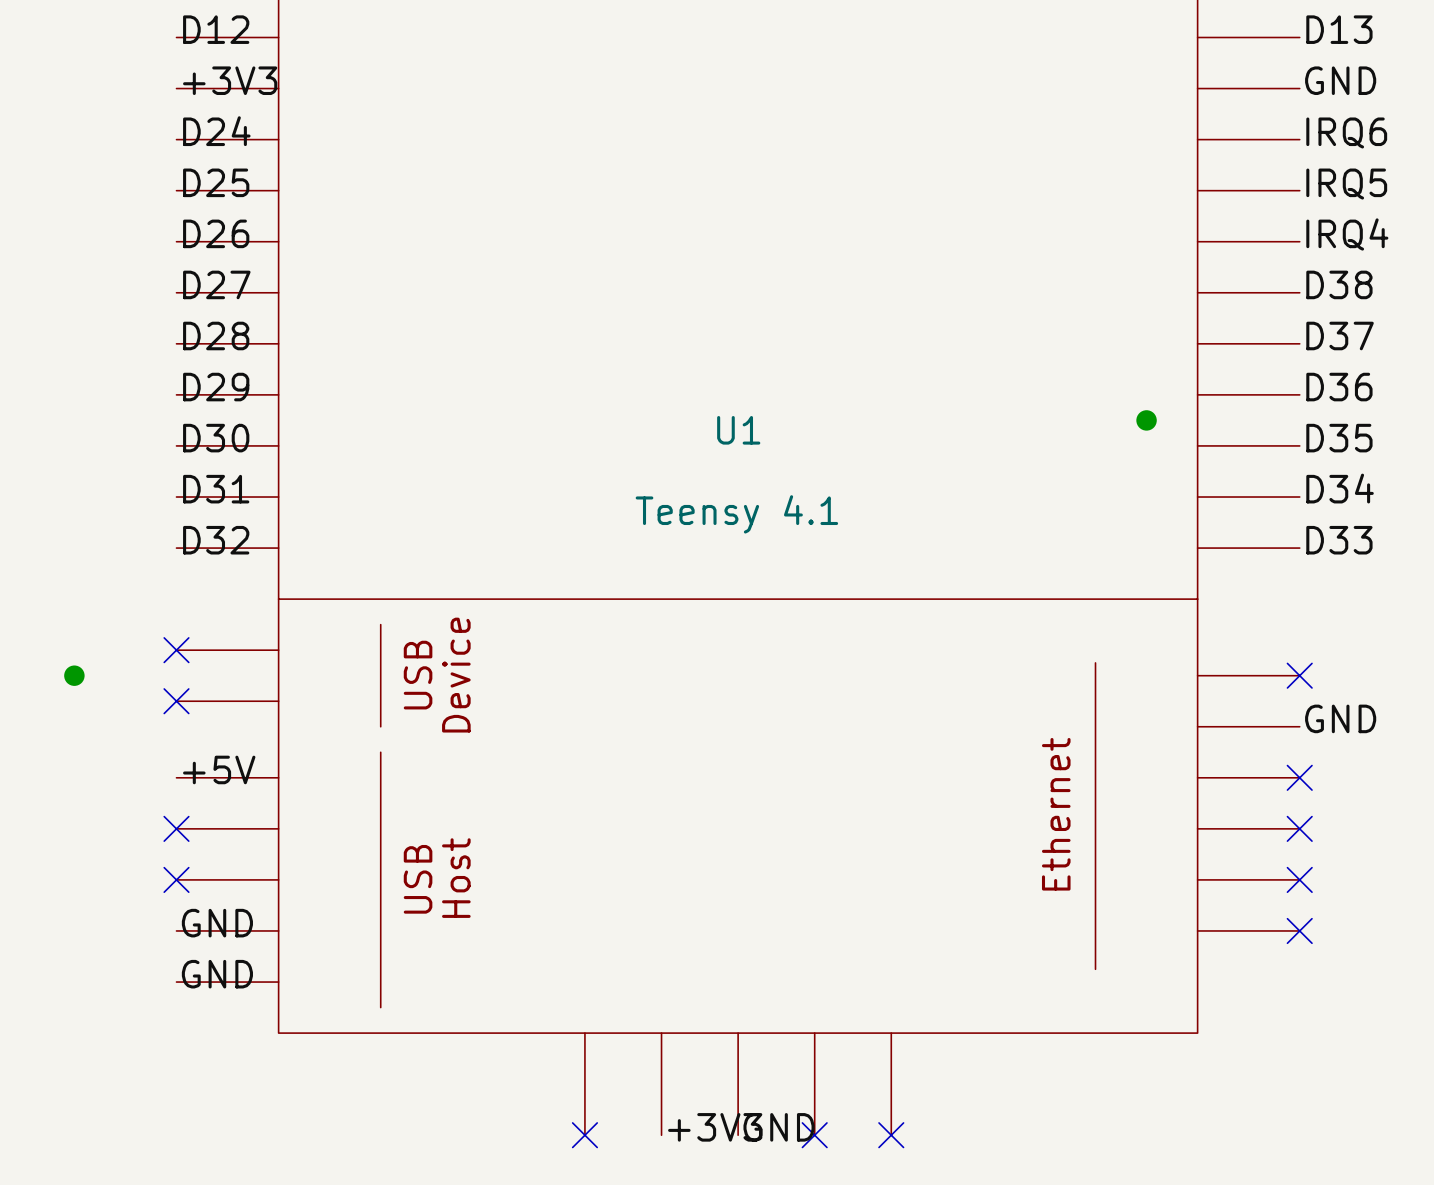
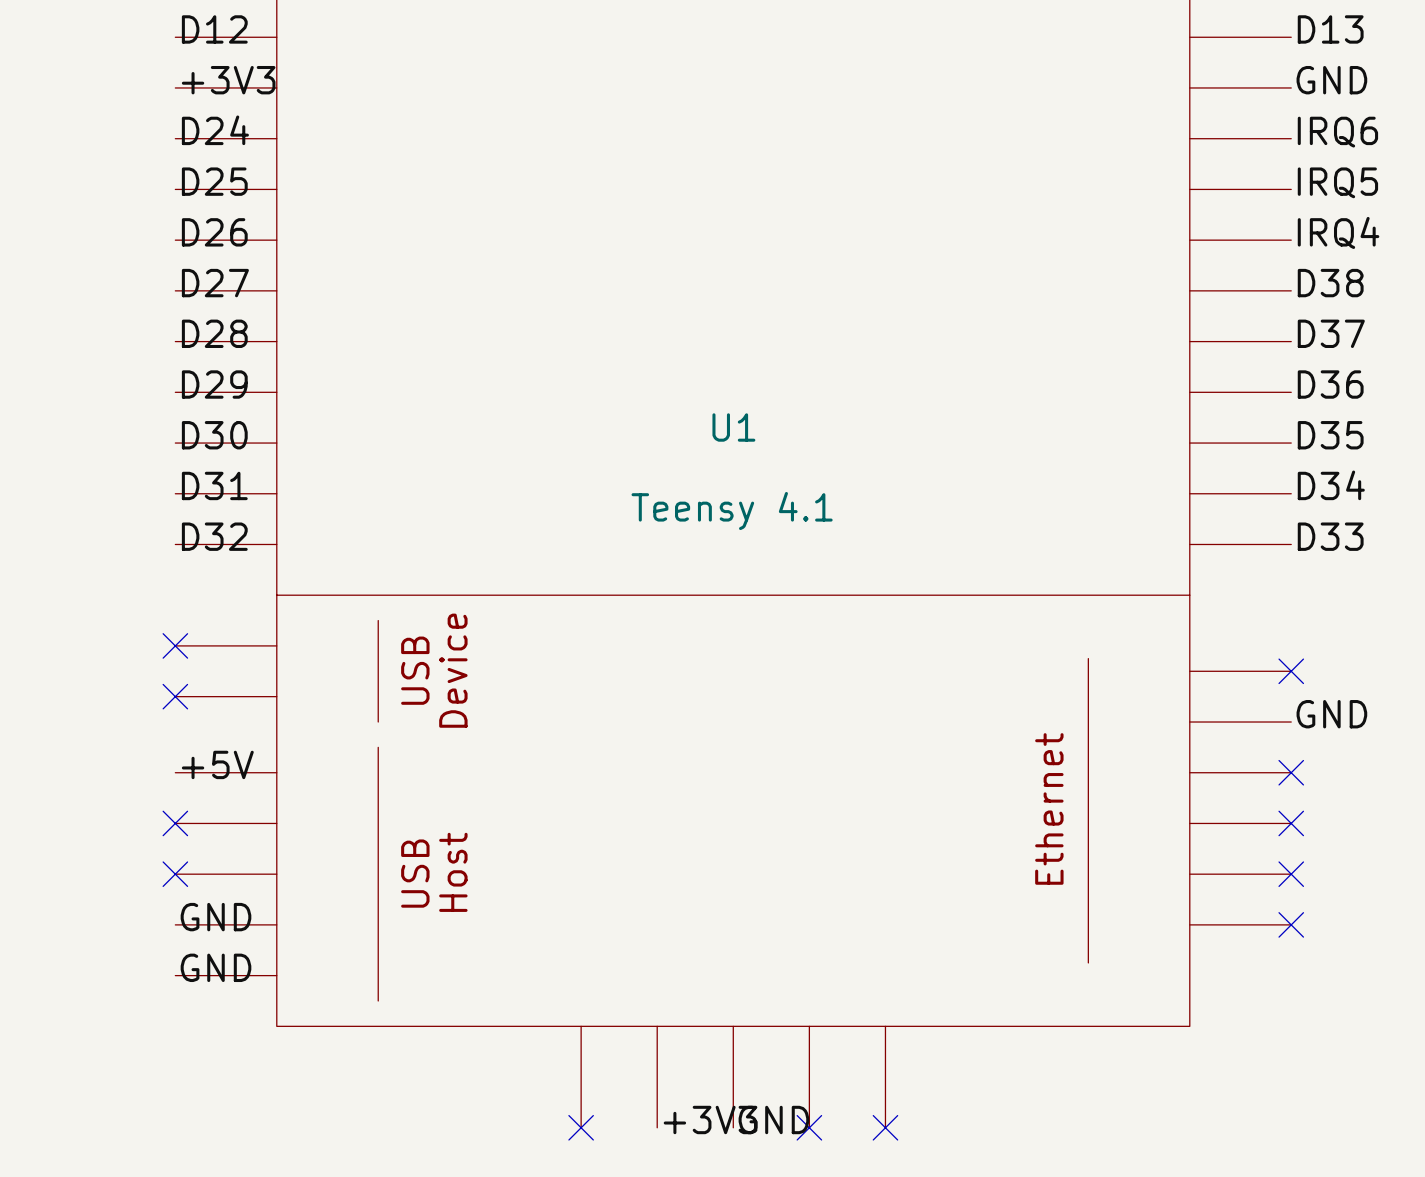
junction: (1146, 420) -> none
junction: (74, 675) -> none

